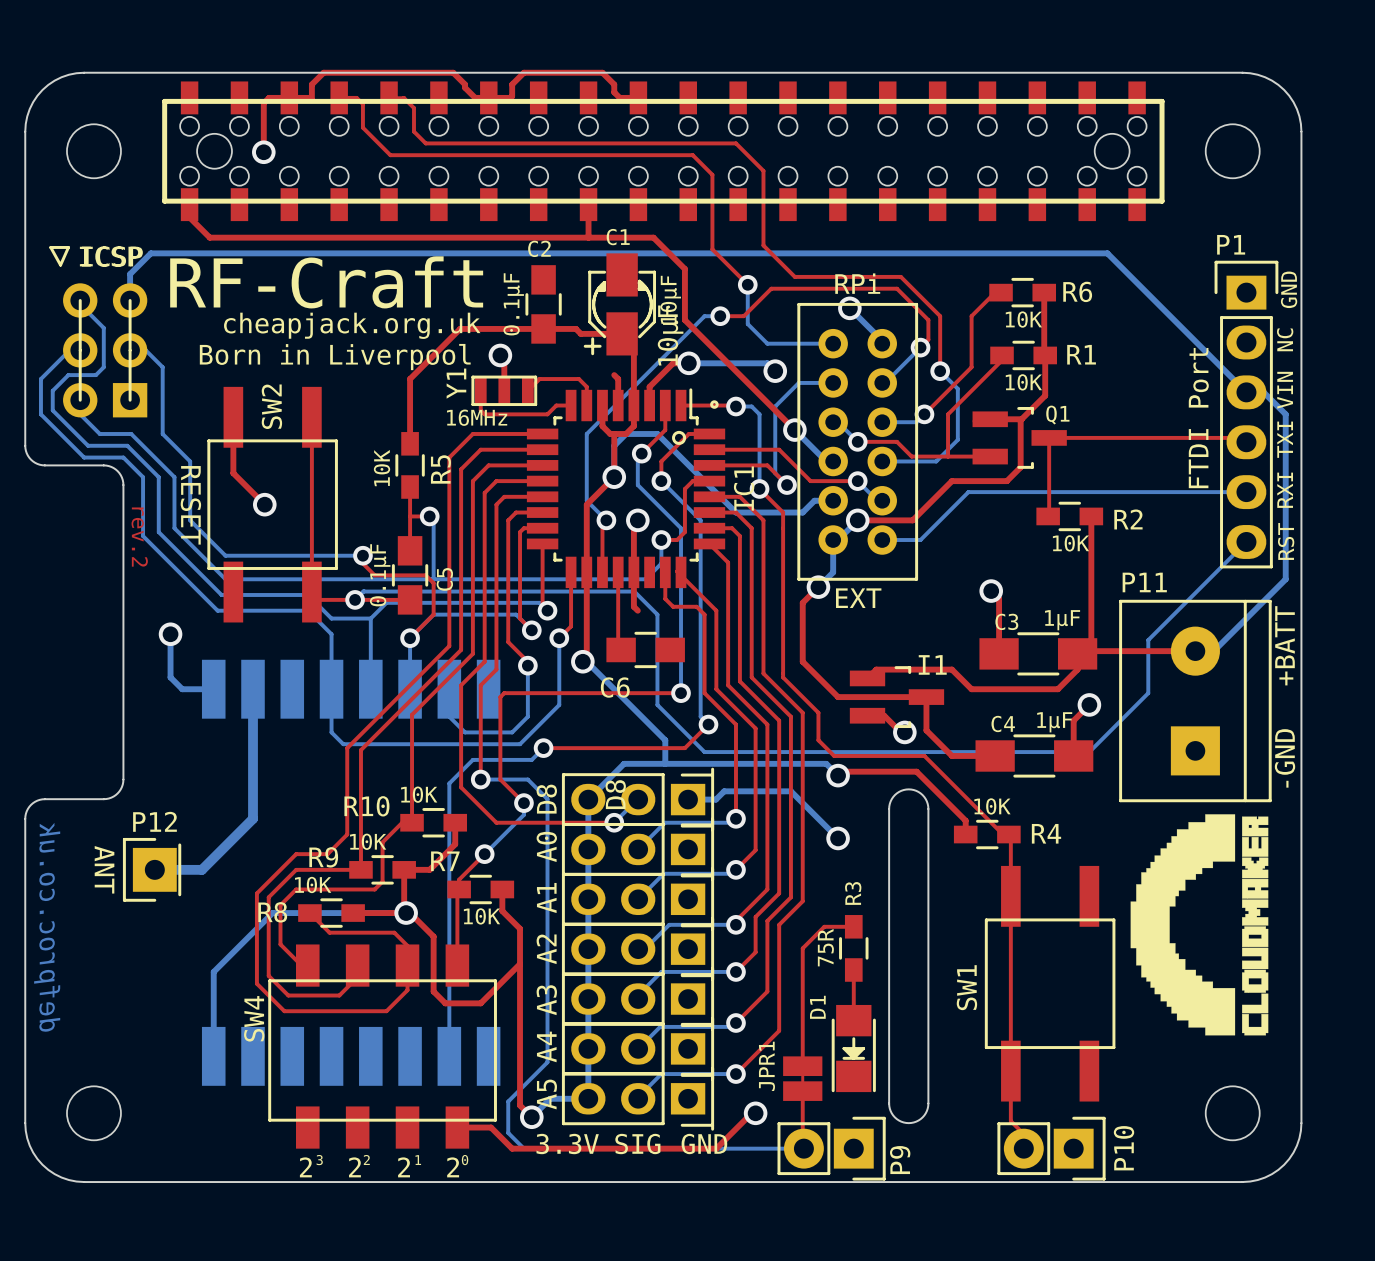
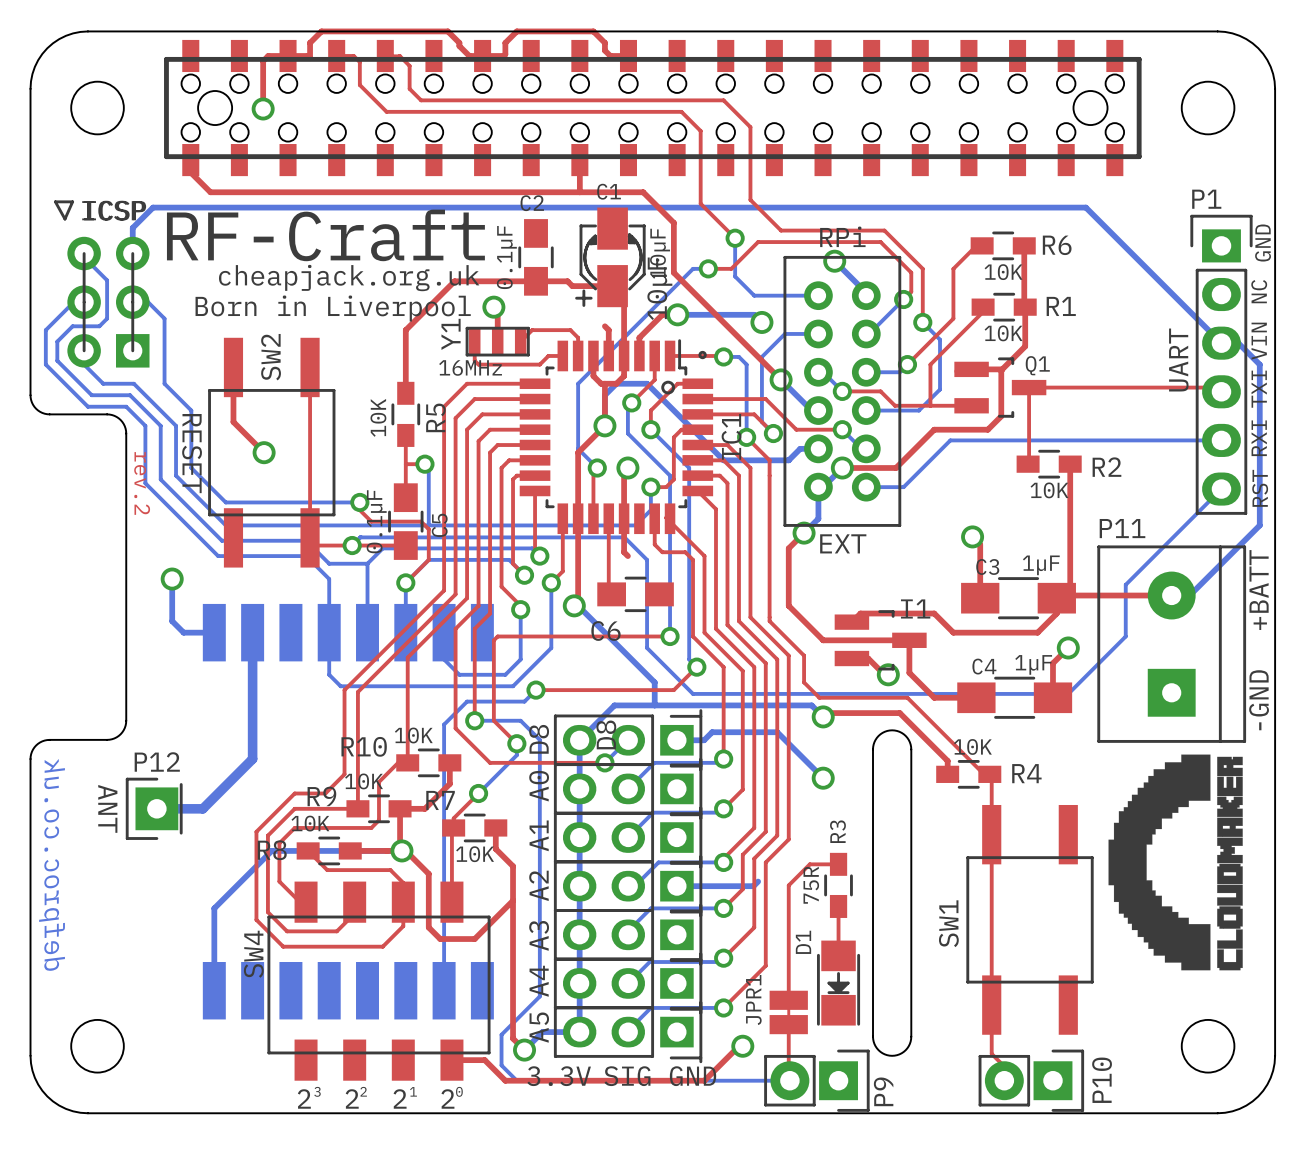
text: FTDI Port (1198, 418) -> UART (1178, 360)
bottom track: none -> (758, 881) (753, 886) (676, 886)

